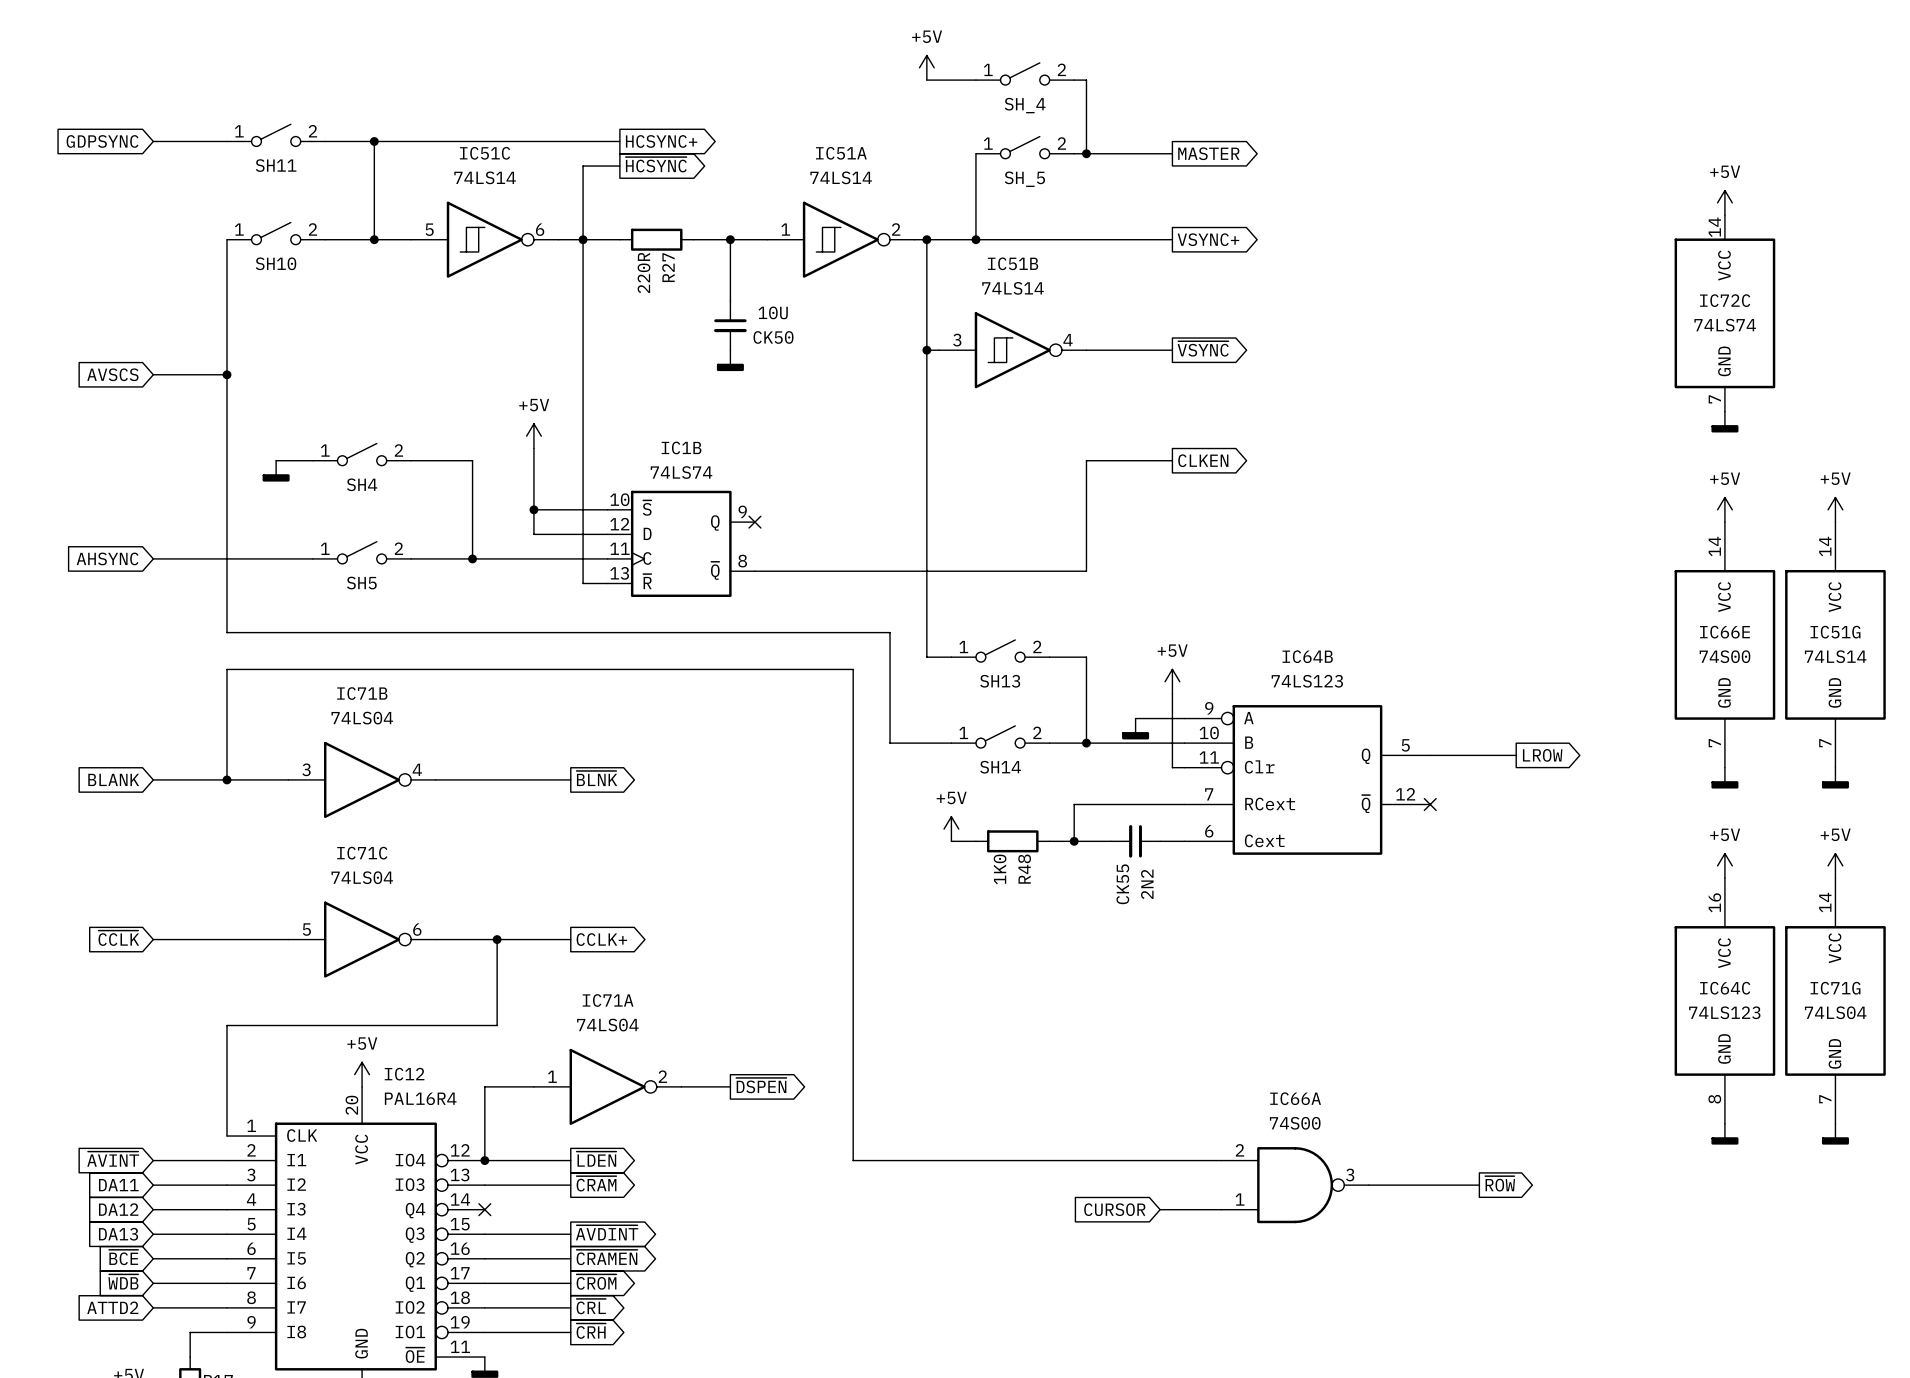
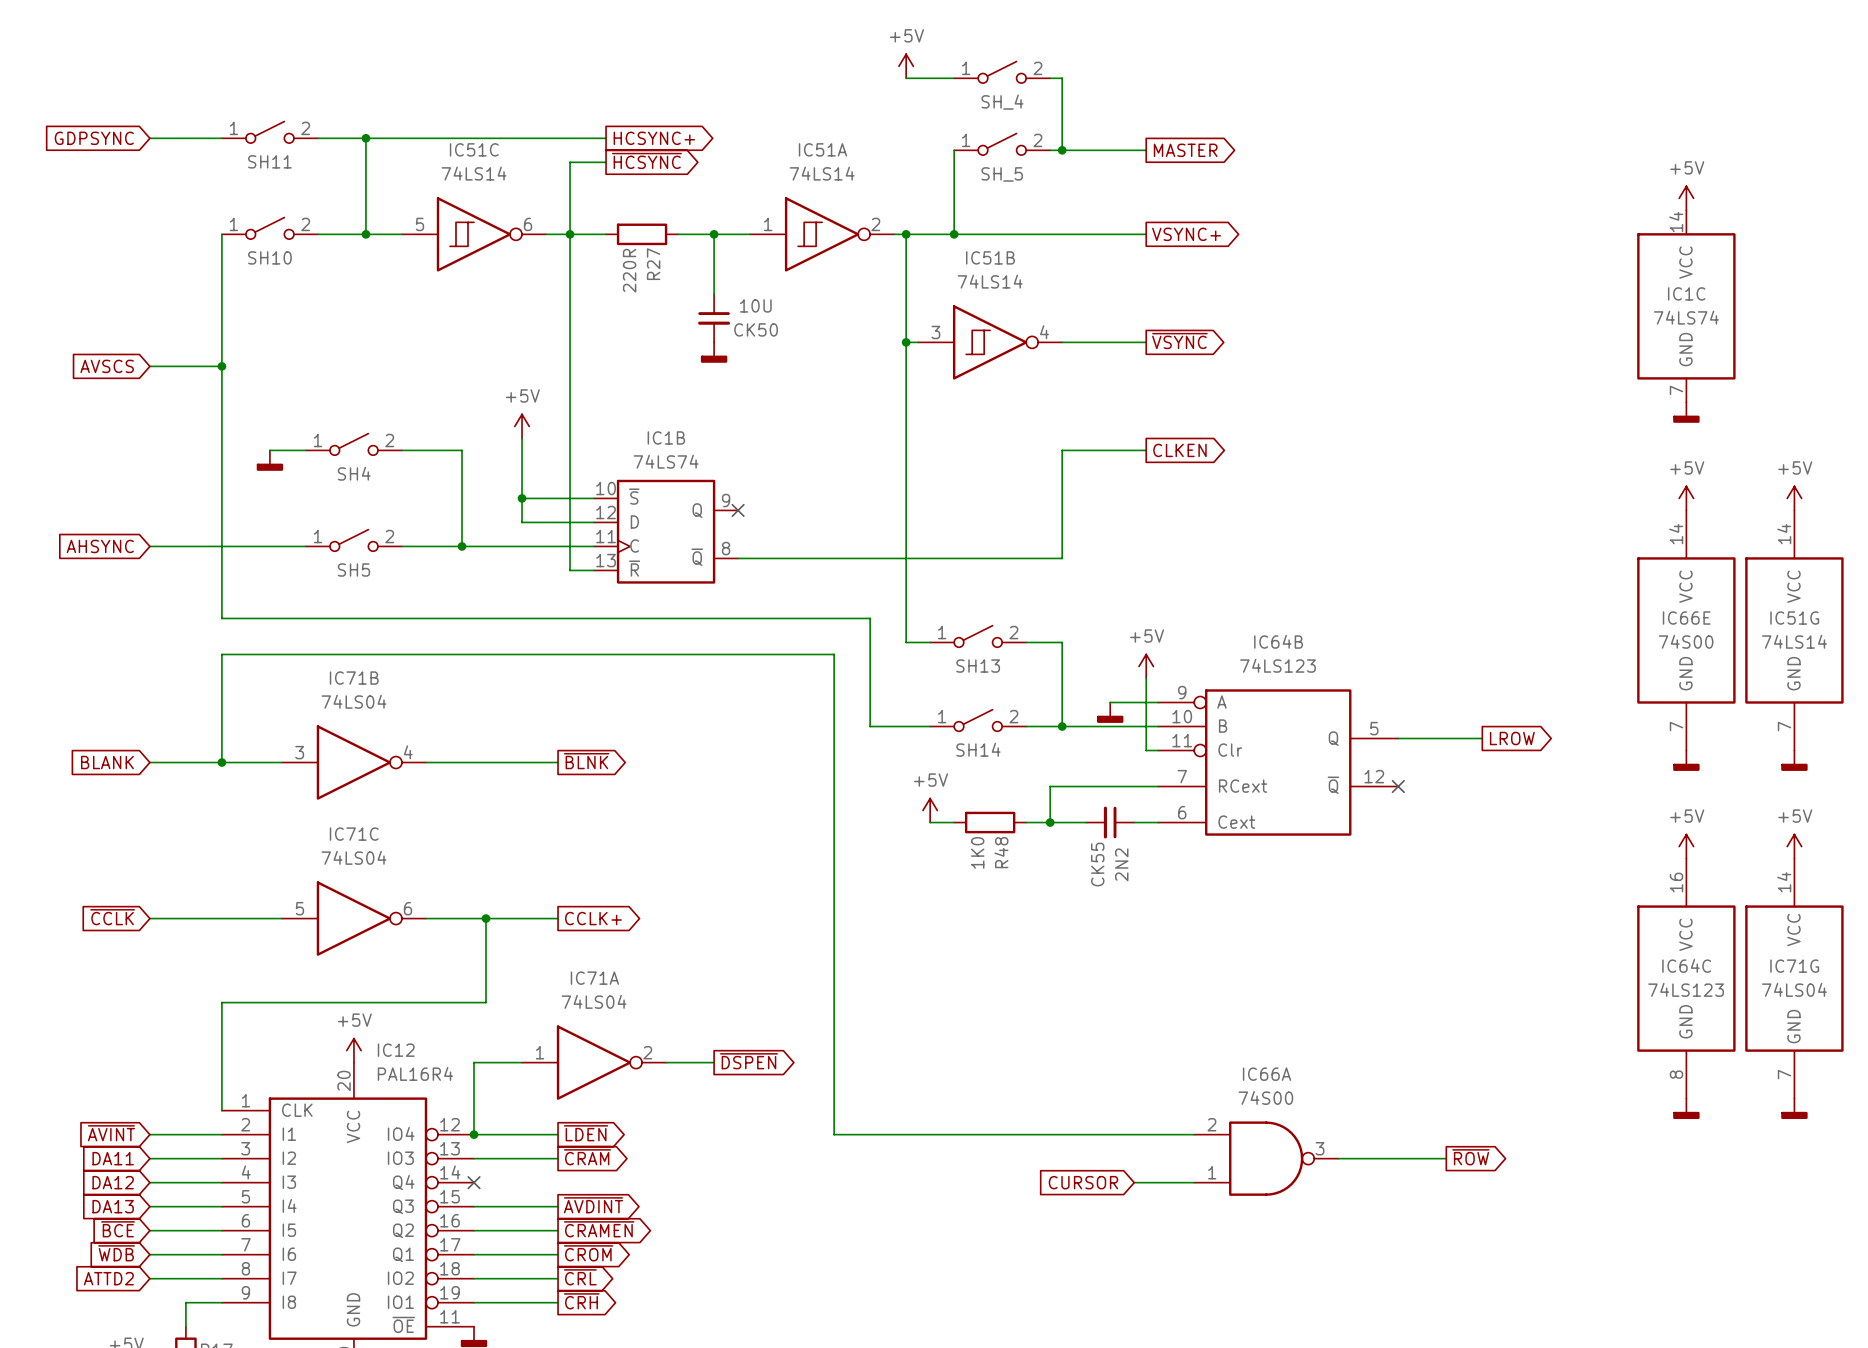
IC72C name: IC72C (1725, 300) -> IC1C (1686, 293)

